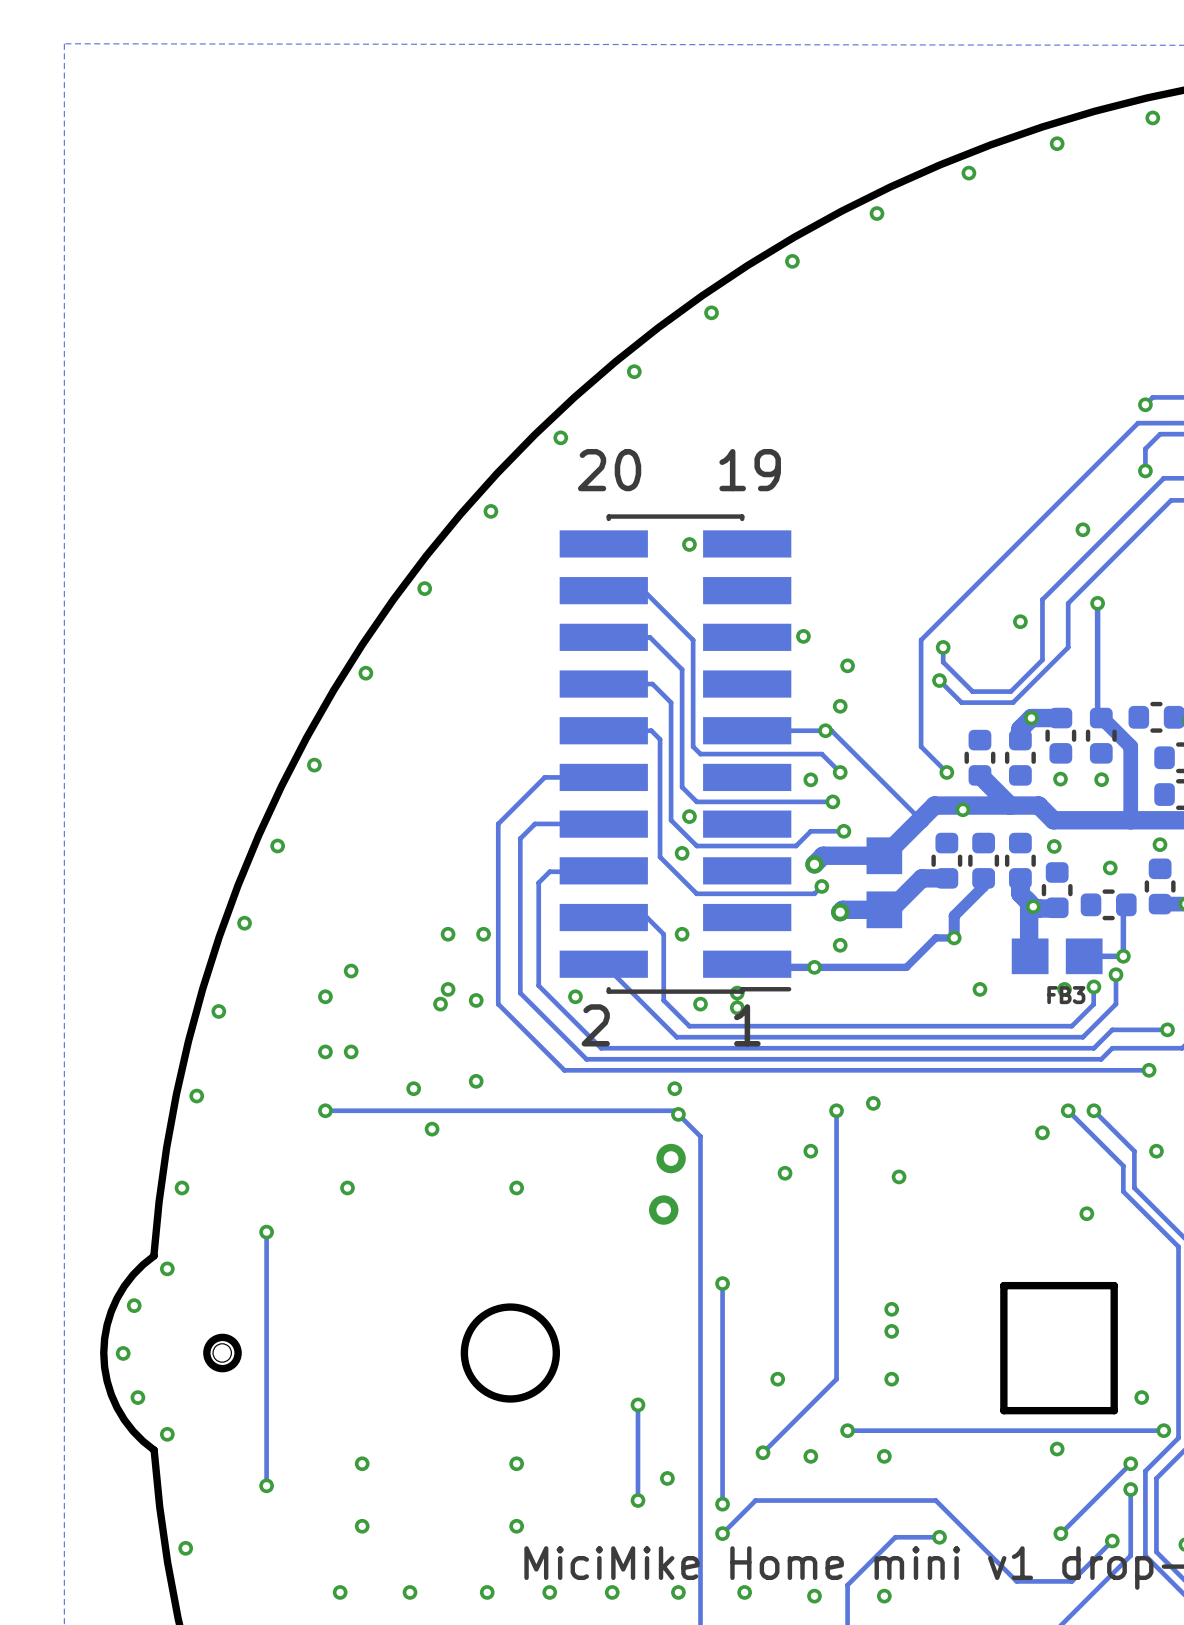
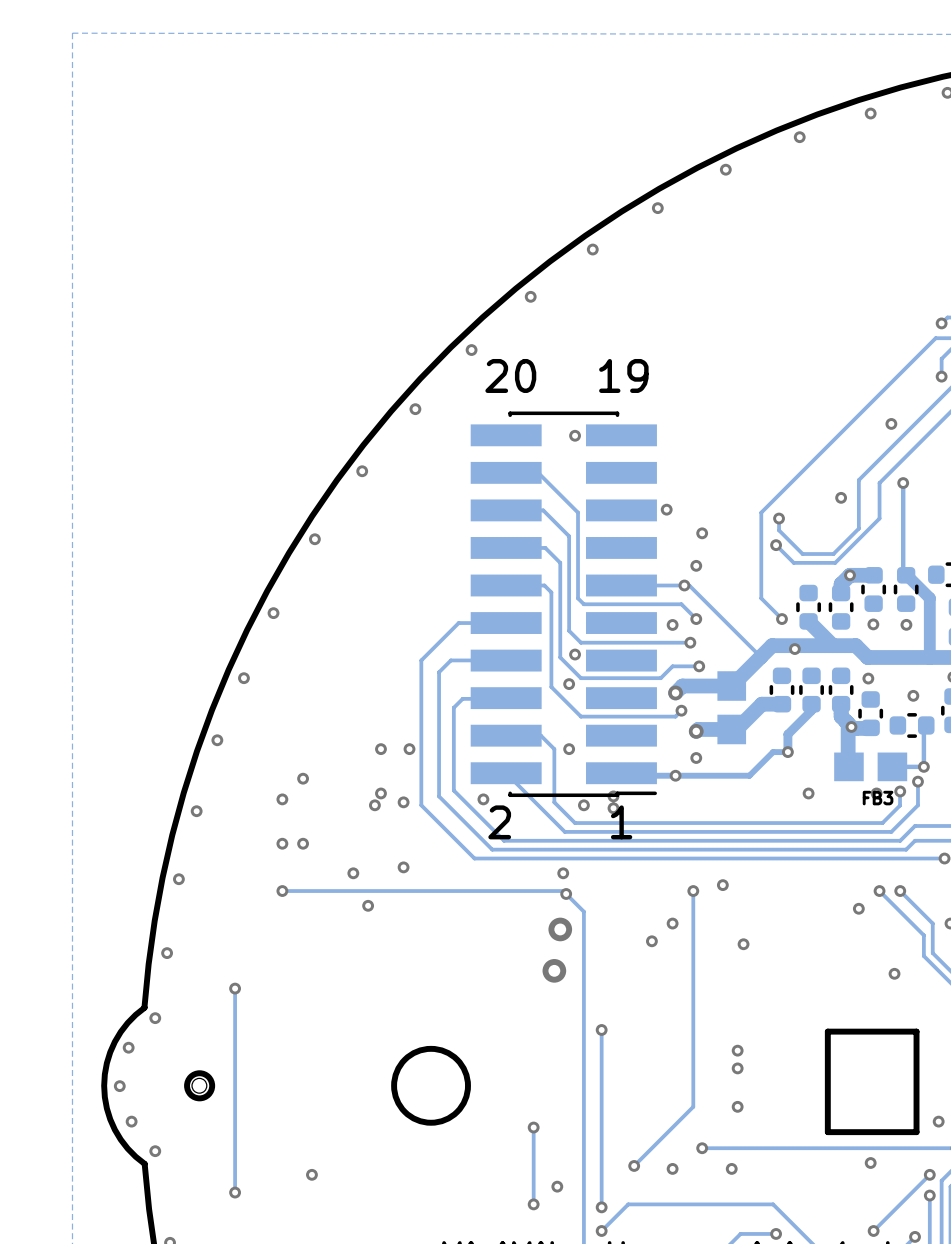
via: (347, 1187) -> none
via: (516, 1187) -> none
via: (777, 1379) -> none
via: (516, 1463) -> none
via: (362, 1526) -> none
via: (516, 1526) -> none

